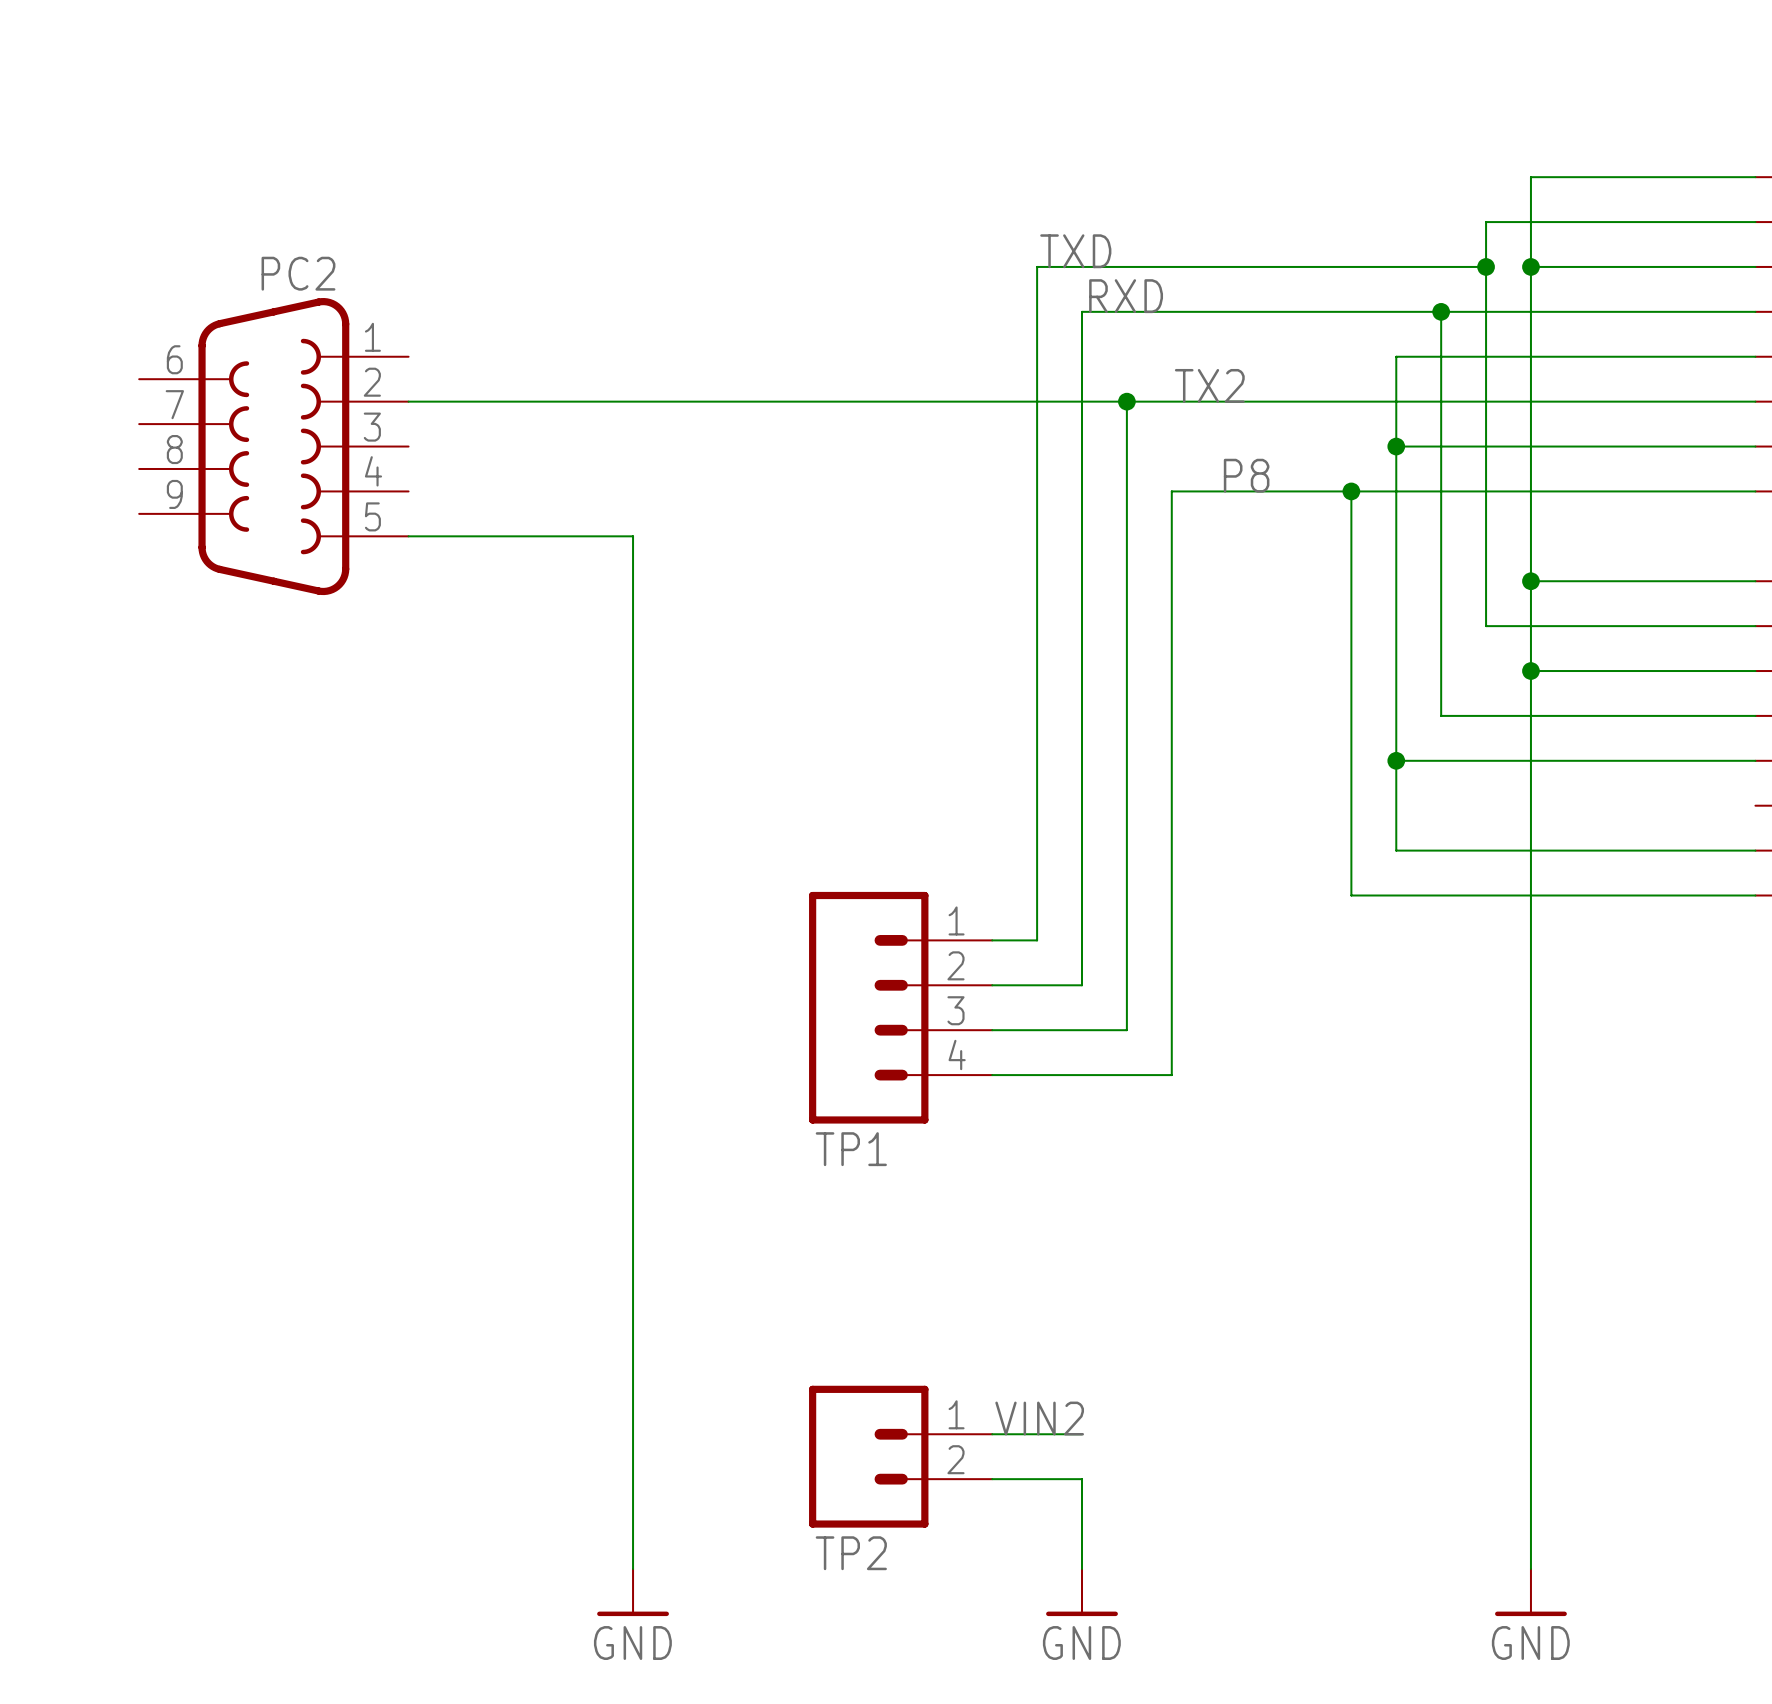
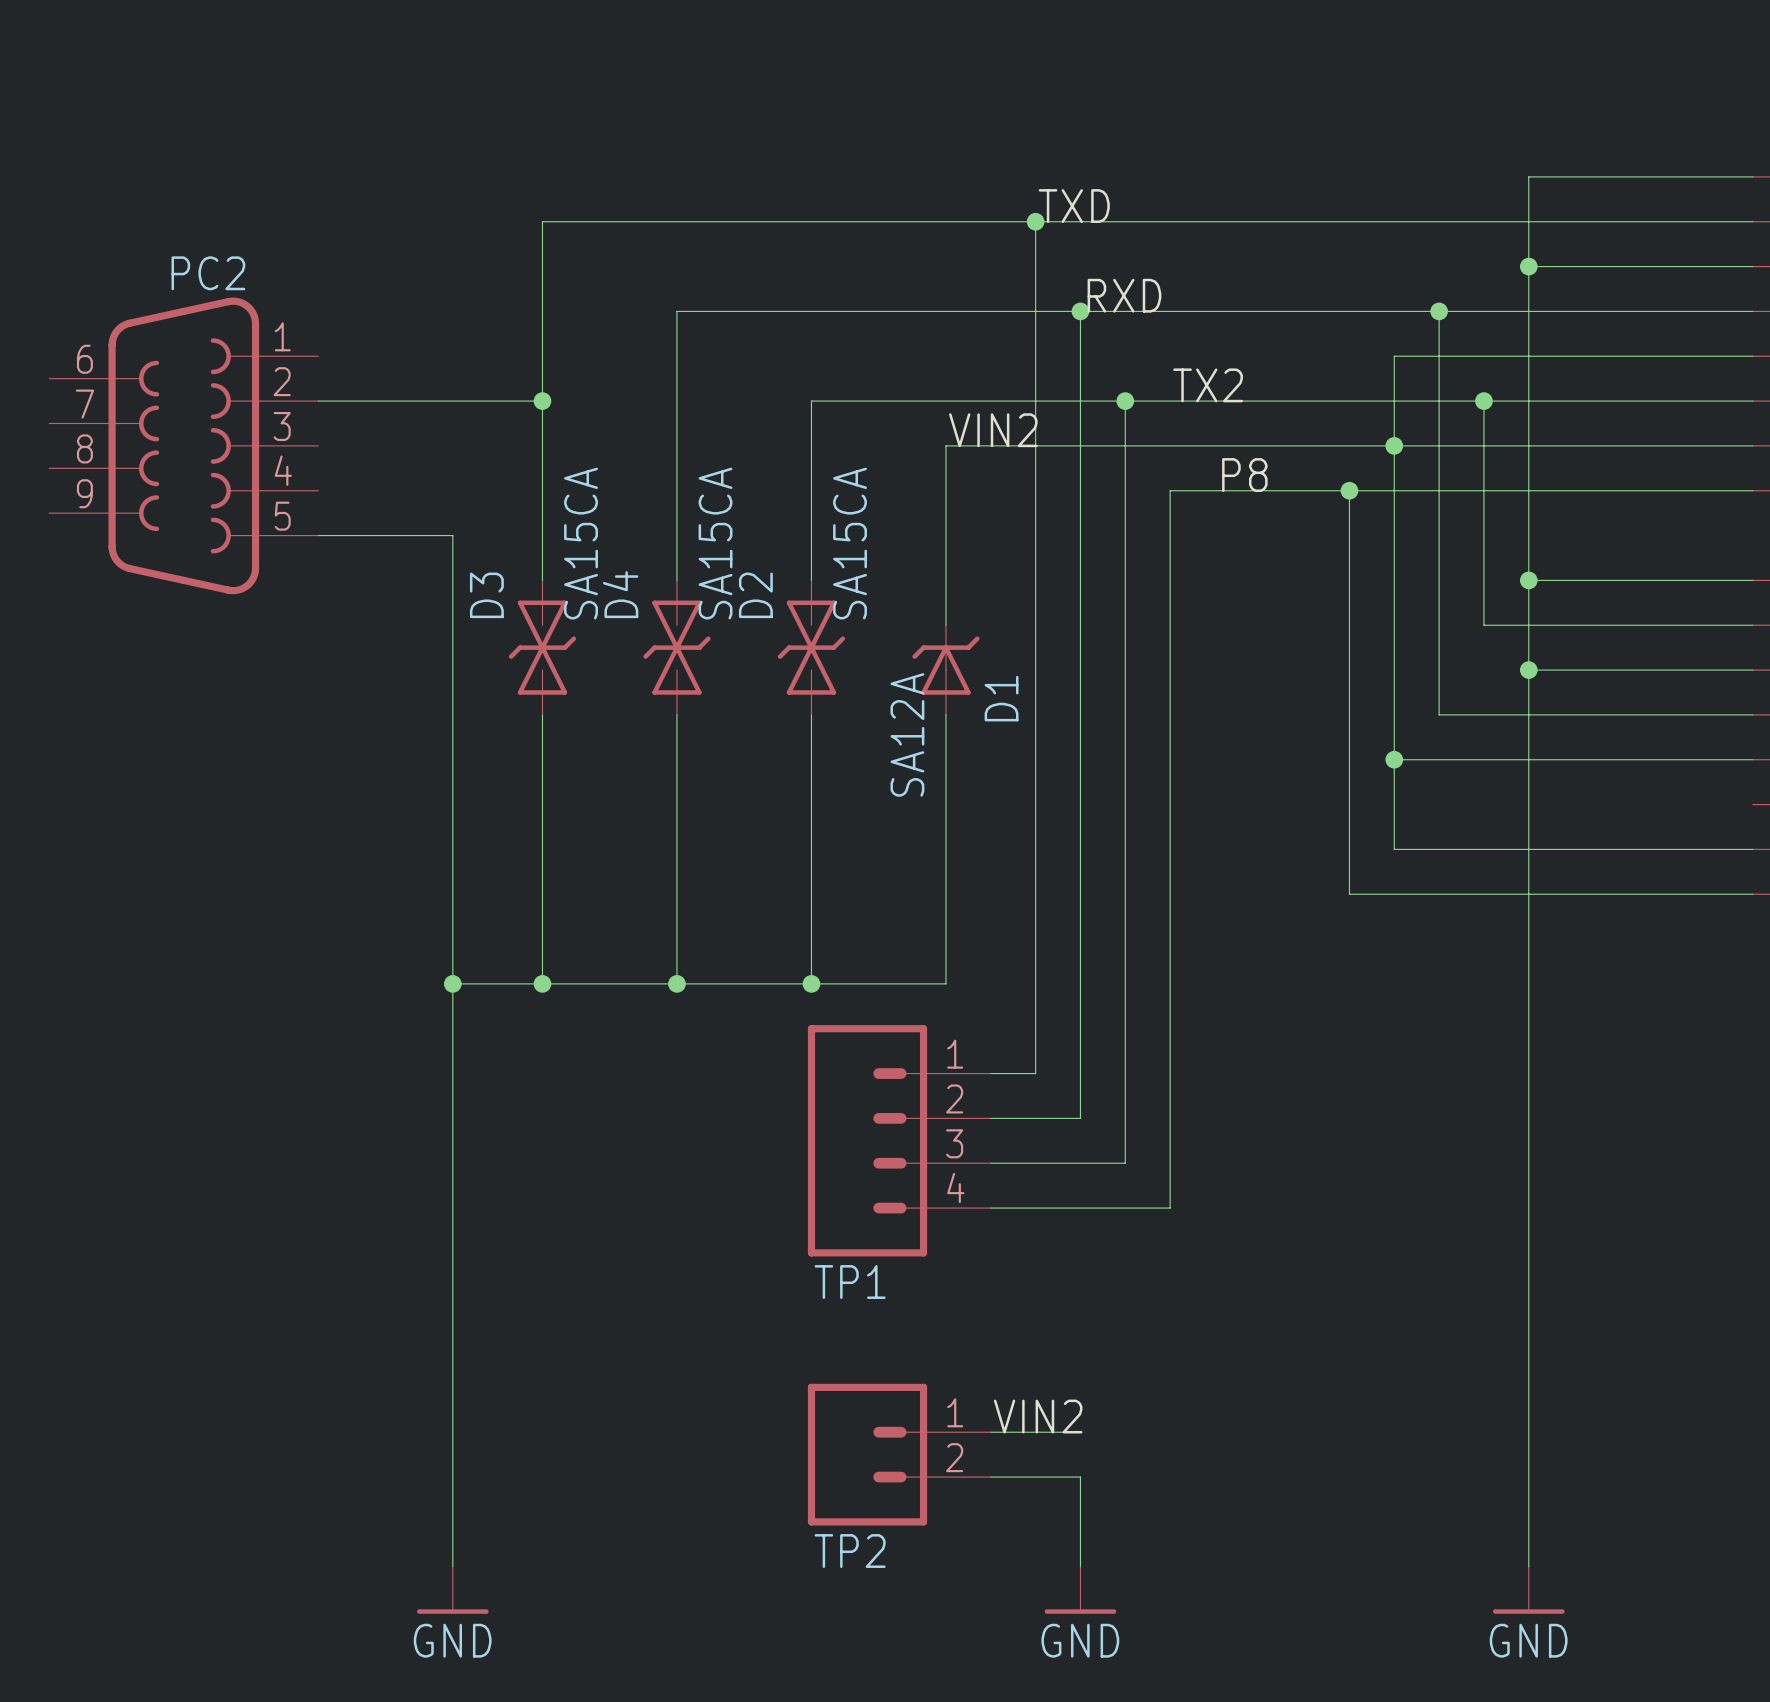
junction: none -> (1035, 221)
wire: (1486, 222) (1486, 401) -> (1483, 221) (542, 221) (542, 580)
label position: TXD (1075, 251) -> TXD (1074, 206)
wire: (1037, 266) (1486, 266) -> (1035, 266) (1035, 221)
junction: (1486, 266) -> none
wire: none -> (1080, 311) (676, 311) (676, 580)
junction: none -> (1080, 311)
wire: (543, 401) (812, 401) -> (811, 580) (811, 401)
junction: none -> (542, 401)
junction: none -> (1483, 401)
label: none -> VIN2 (993, 430)
PC2 position: (273, 446) -> (183, 445)
wire: none -> (1394, 445) (945, 445) (945, 625)
wire: (453, 536) (633, 536) (633, 1568) -> (452, 535) (452, 1566)
D3: none -> SA15CA (542, 647)
D4: none -> SA15CA (676, 647)
D2: none -> SA15CA (811, 647)
D1: none -> SA12A (945, 670)
wire: none -> (542, 714) (542, 983)
wire: none -> (676, 714) (676, 983)
wire: none -> (811, 714) (811, 983)
wire: none -> (945, 714) (945, 983) (452, 983)
wire: (992, 940) (1037, 940) -> (1035, 1073) (1035, 939)
junction: none -> (452, 983)
junction: none -> (542, 983)
junction: none -> (676, 983)
junction: none -> (811, 983)
wire: (992, 985) (1082, 985) -> (990, 1118) (1080, 1118) (1080, 983)
TP1 position: (900, 1007) -> (899, 1140)
wire: (992, 1030) (1126, 1030) -> (990, 1163) (1125, 1163) (1125, 1028)
wire: (1037, 1075) (1171, 1075) -> (990, 1208) (1170, 1208) (1170, 1073)
power symbol position: GND (633, 1592) -> GND (452, 1590)

